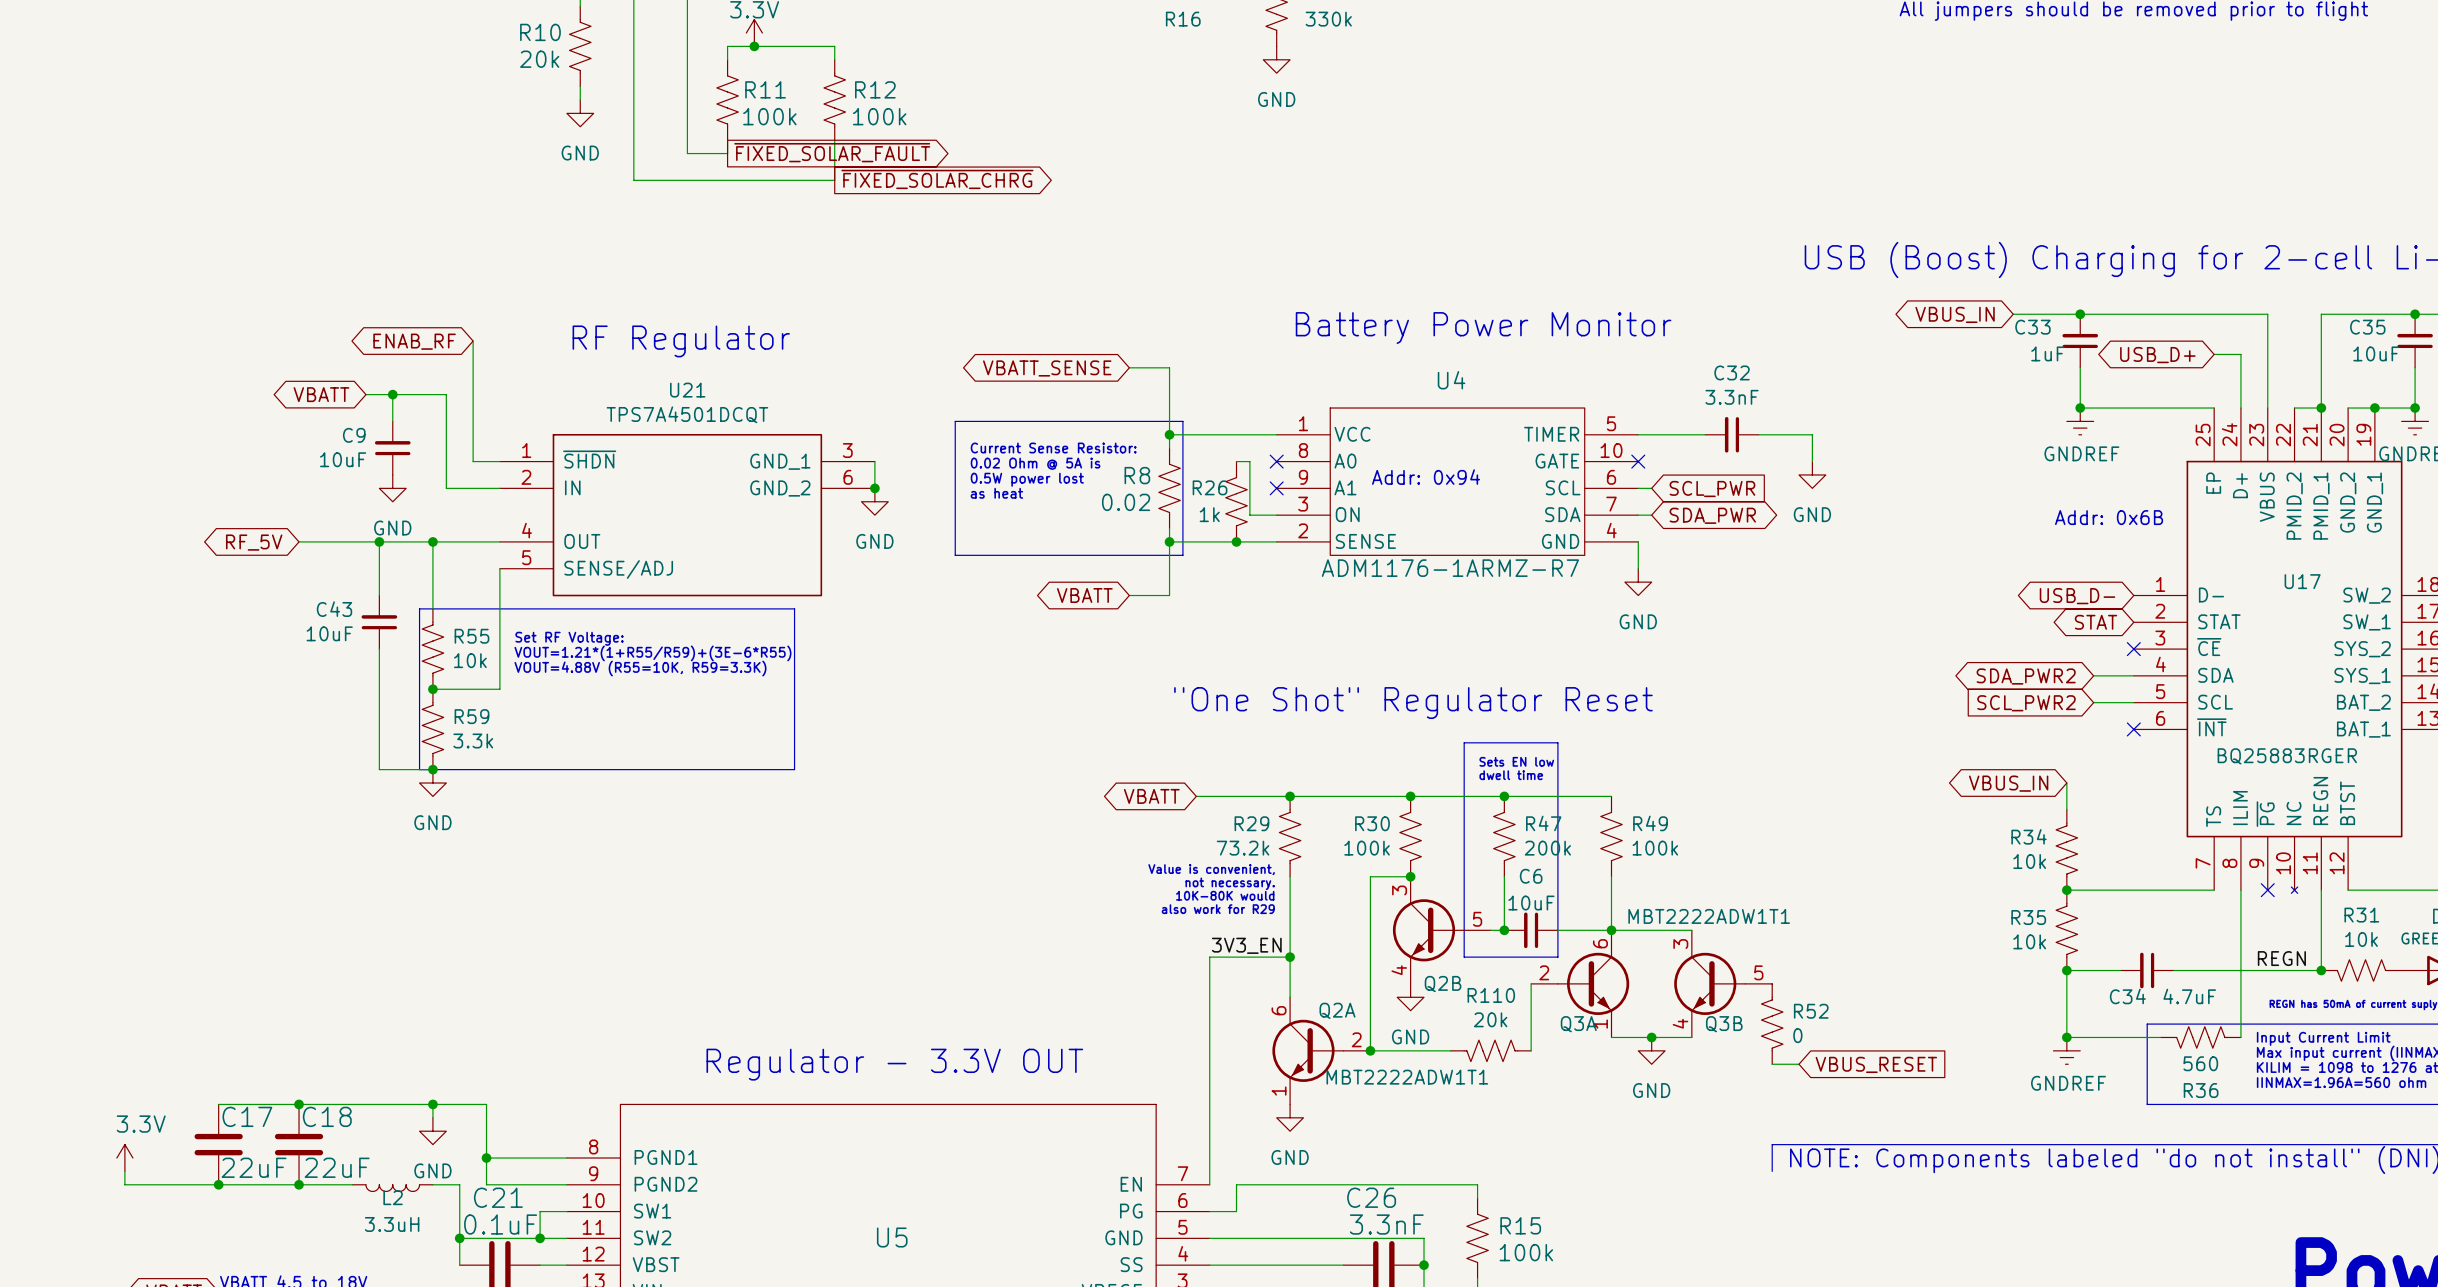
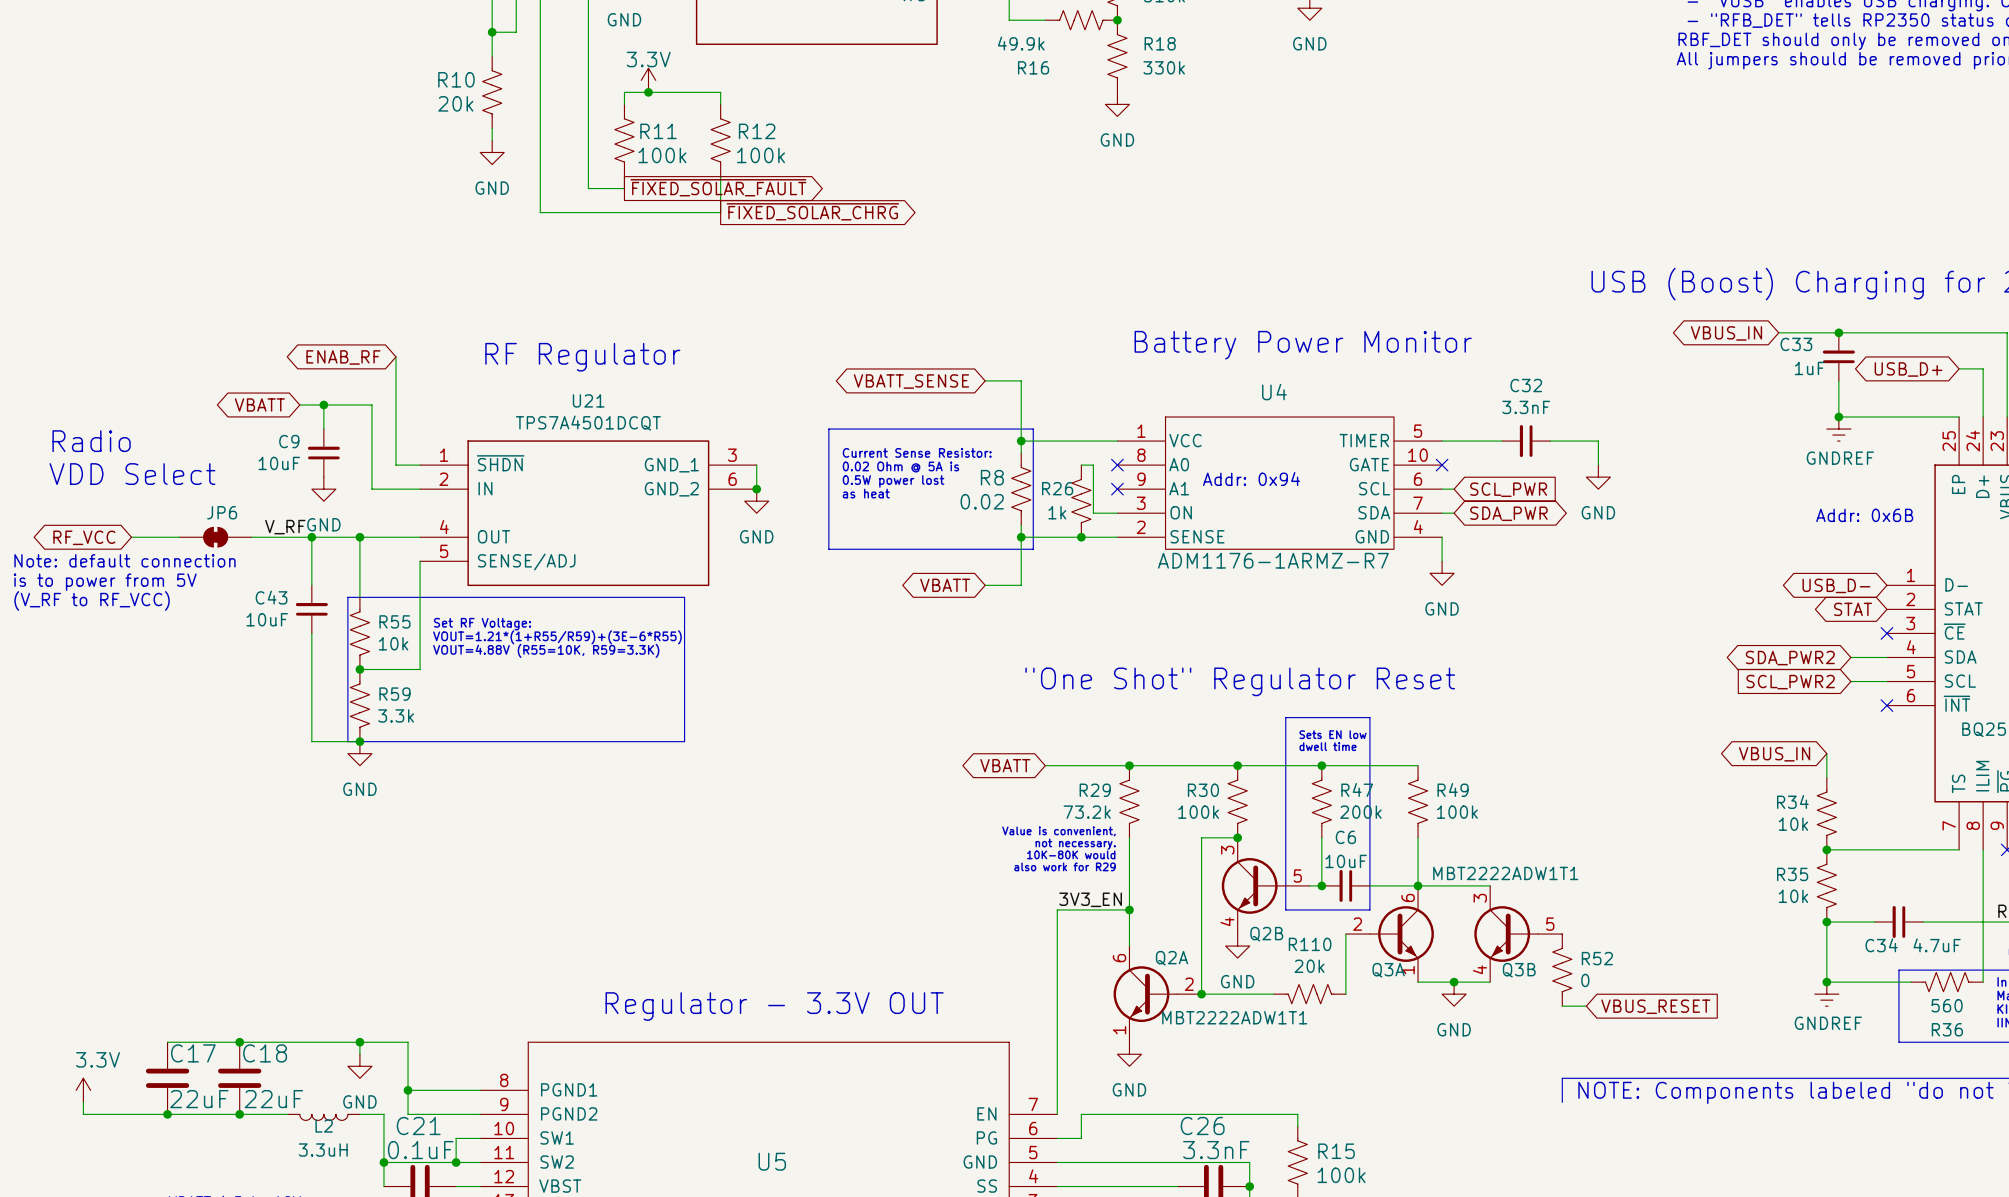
text: none -> Radio (91, 441)
text: none -> VDD Select (132, 474)
label: none -> V_RF (285, 527)
wire: none -> (131, 537) (179, 537)
JP6: none -> (215, 537)
global label: none -> RF_VCC (84, 537)
global label: RF_5V (254, 542) -> none
text: none -> Note: default connection (124, 560)
text: none -> is to power from 5V (105, 582)
text: none -> (V_RF to RF_VCC) (92, 600)

